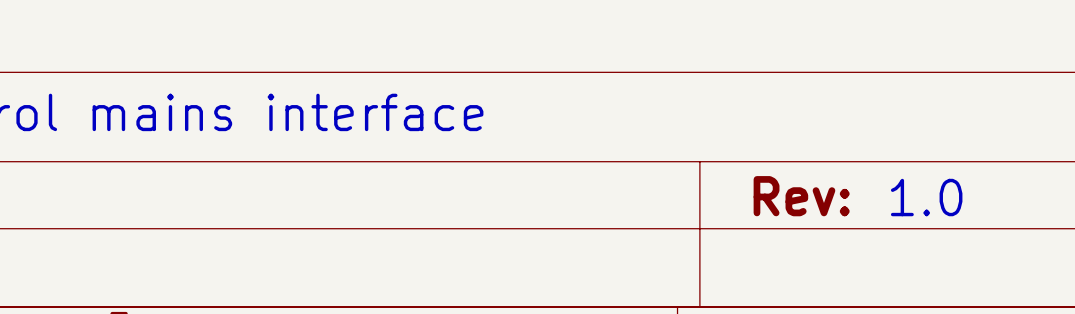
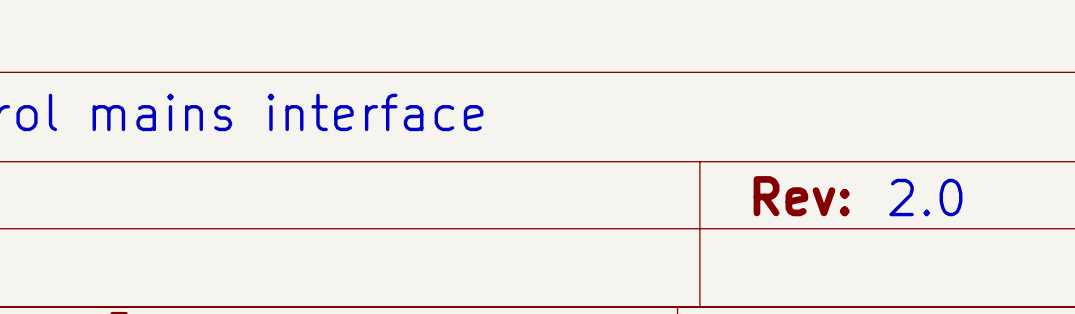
text: 1.0 (926, 197) -> 2.0 (925, 197)

